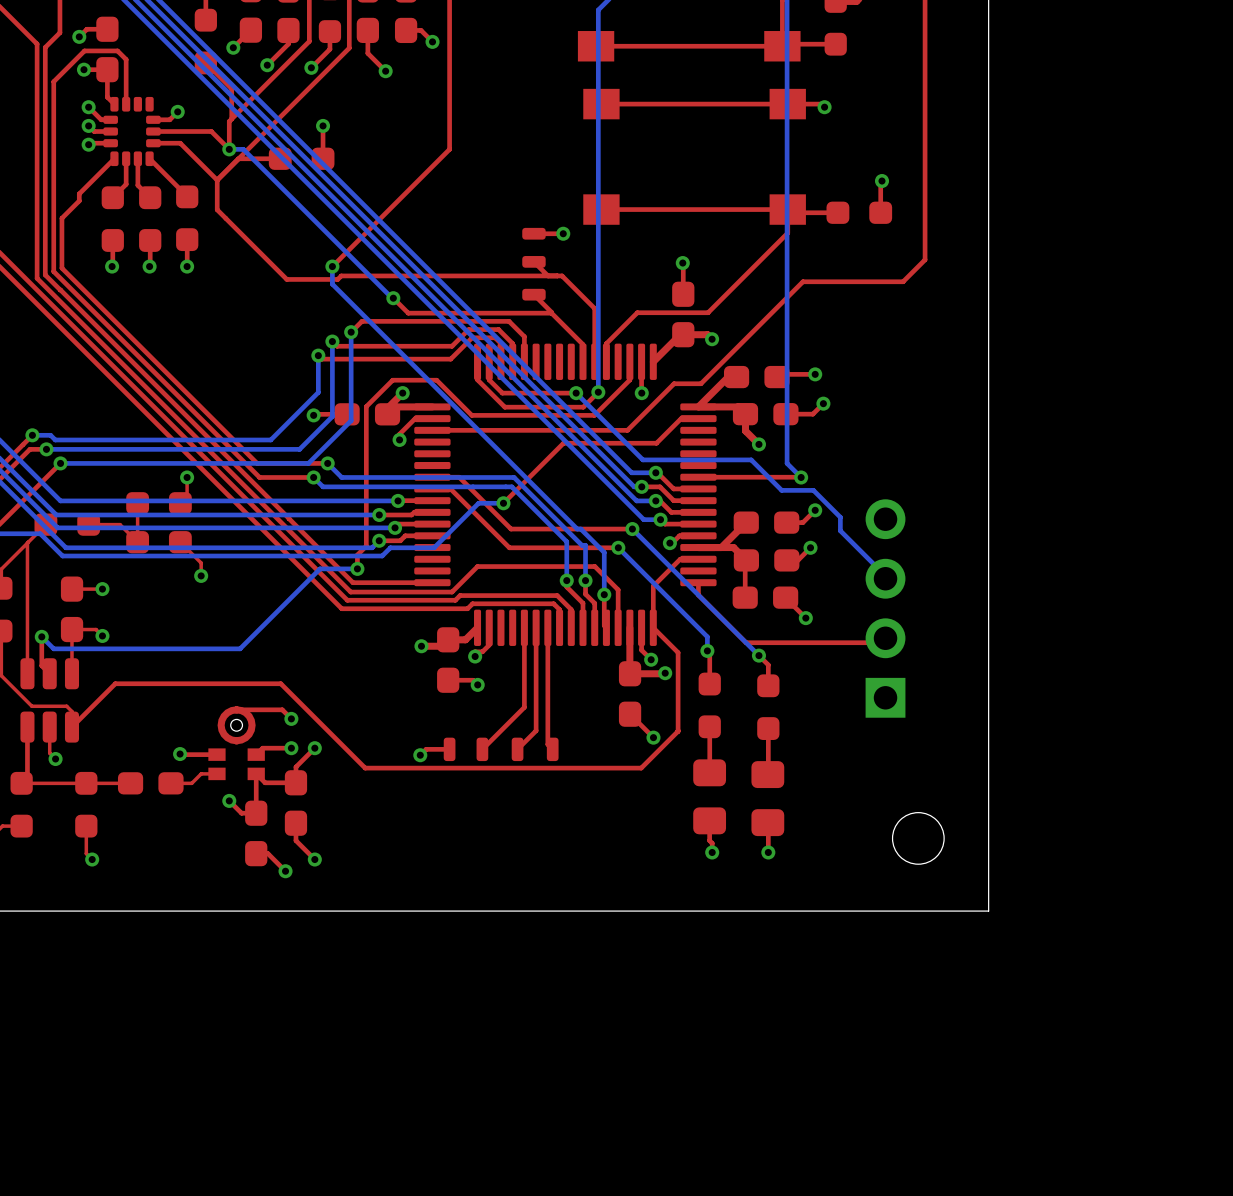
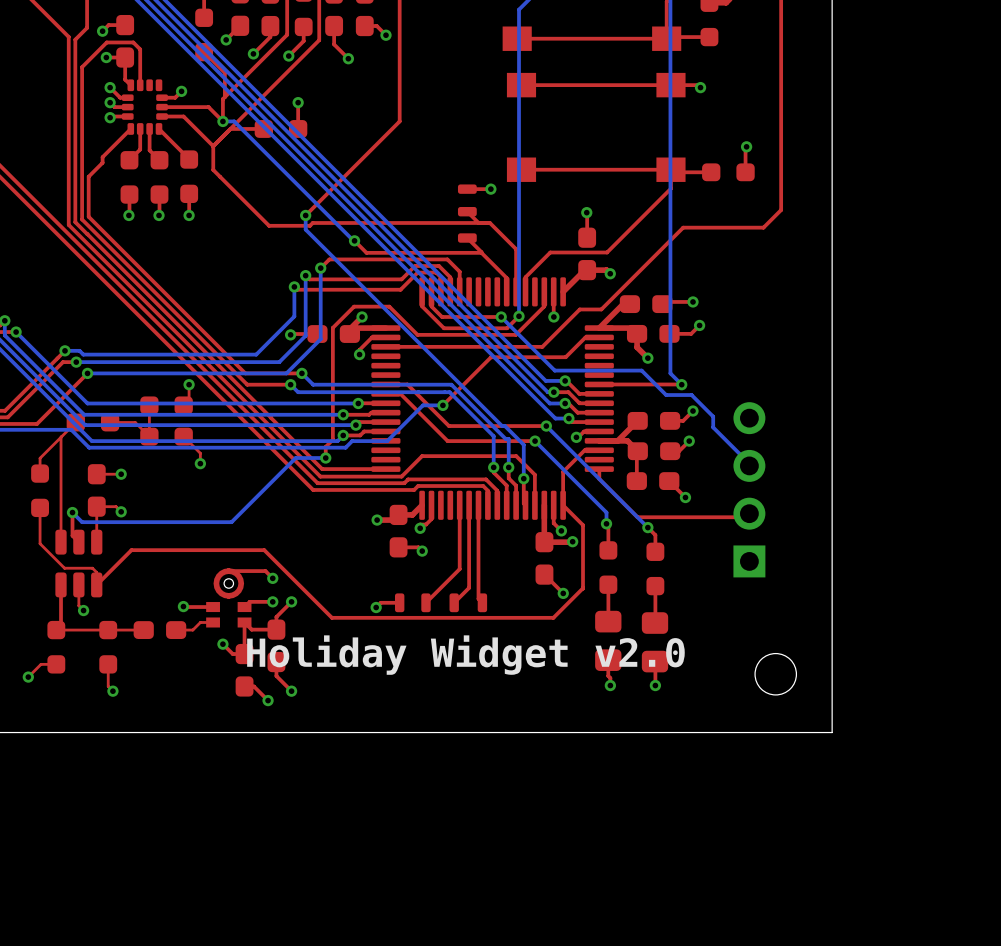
text: none -> Holiday Widget v2.0 (465, 655)

